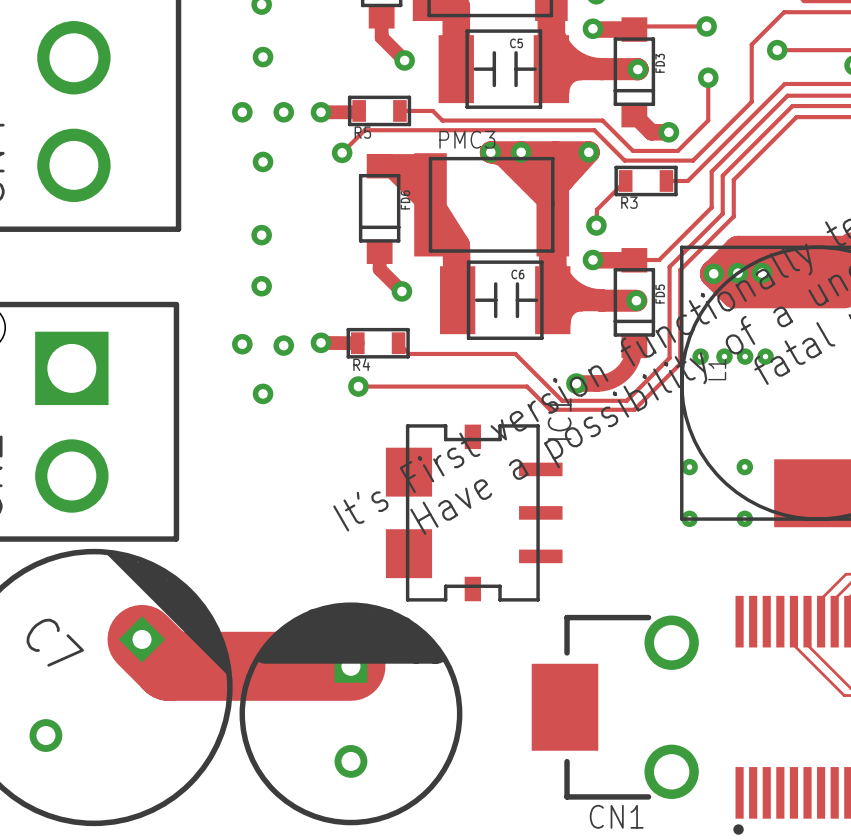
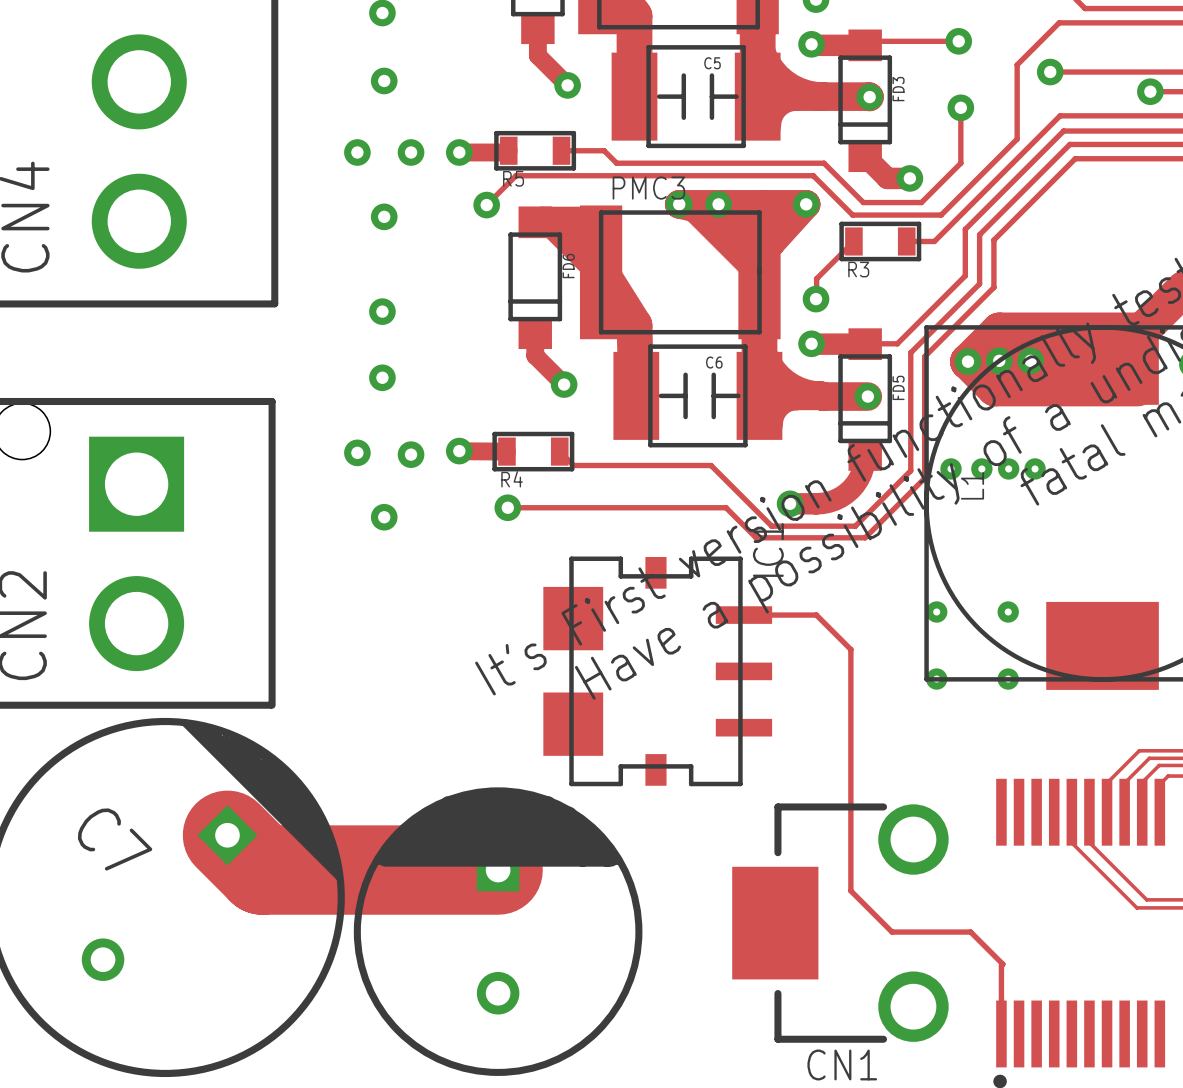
track: none -> (743, 615) (816, 615) (850, 649) (850, 890) (892, 932) (970, 932) (1002, 964) (1001, 1033)

